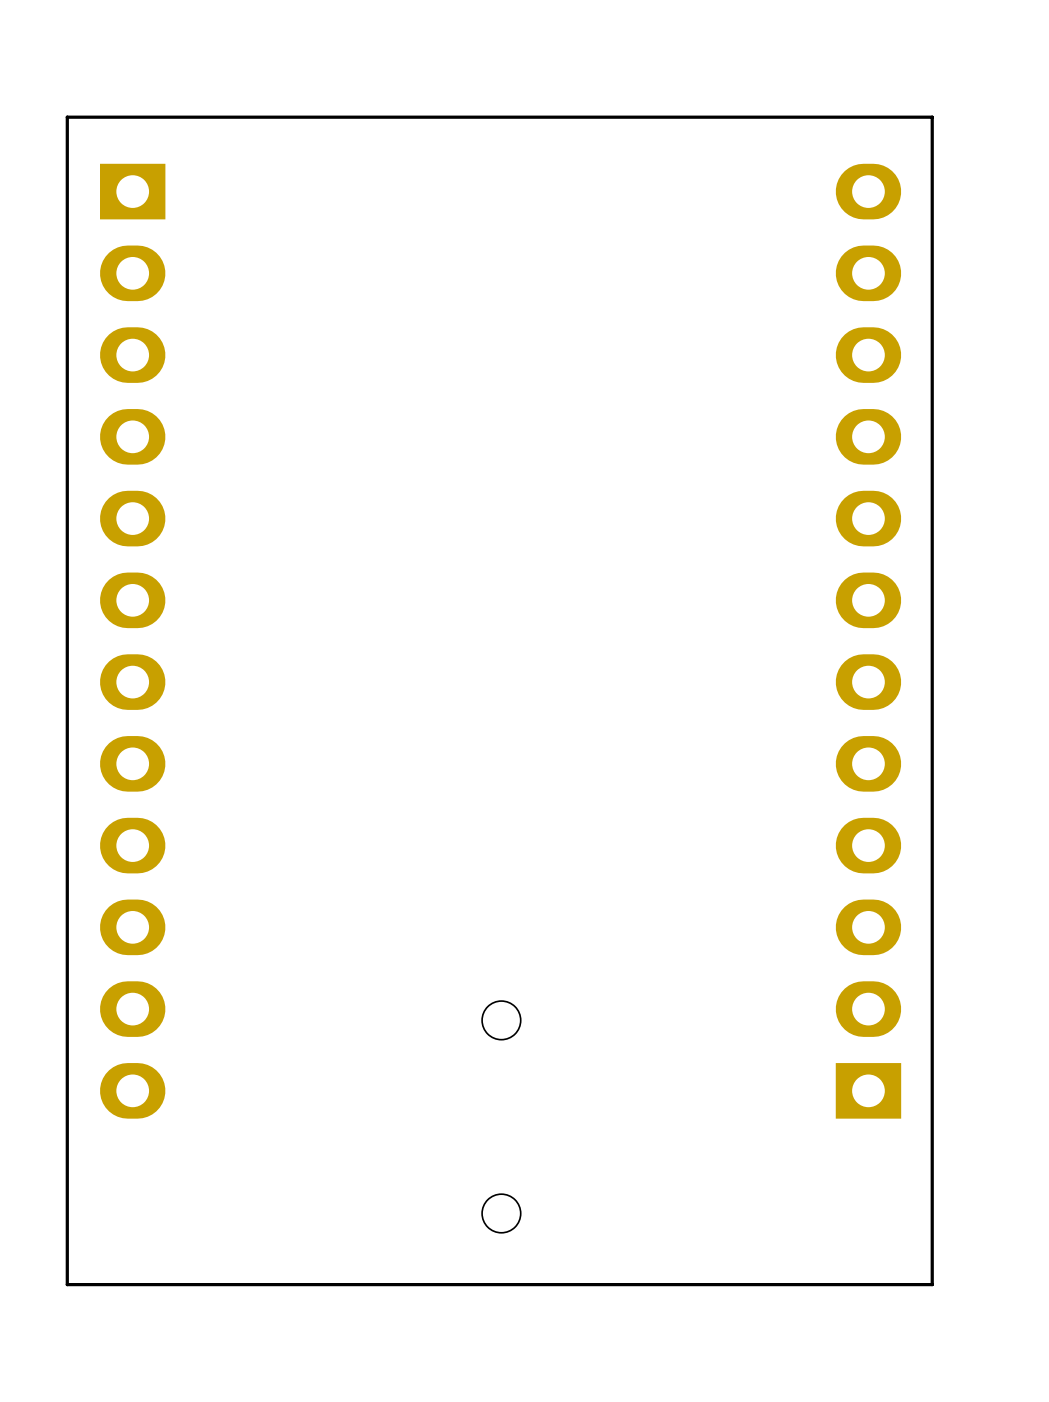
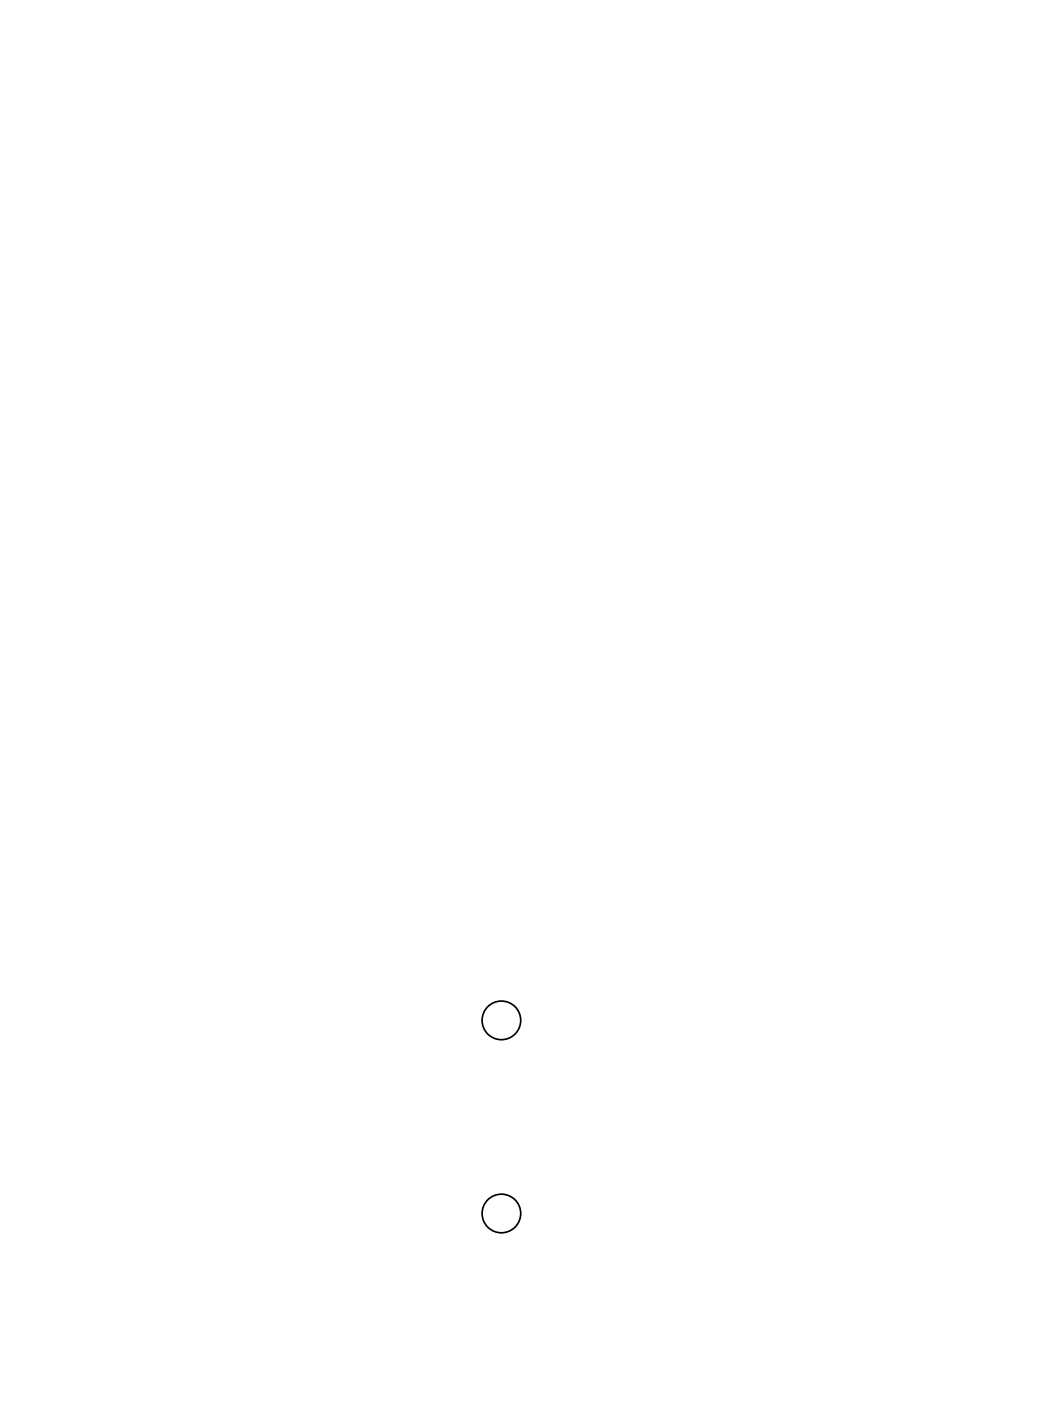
board edge: (932, 117) (67, 117) (67, 1284) (932, 1284) (932, 117) -> none
part: (132, 641) -> none
part: (868, 641) -> none

